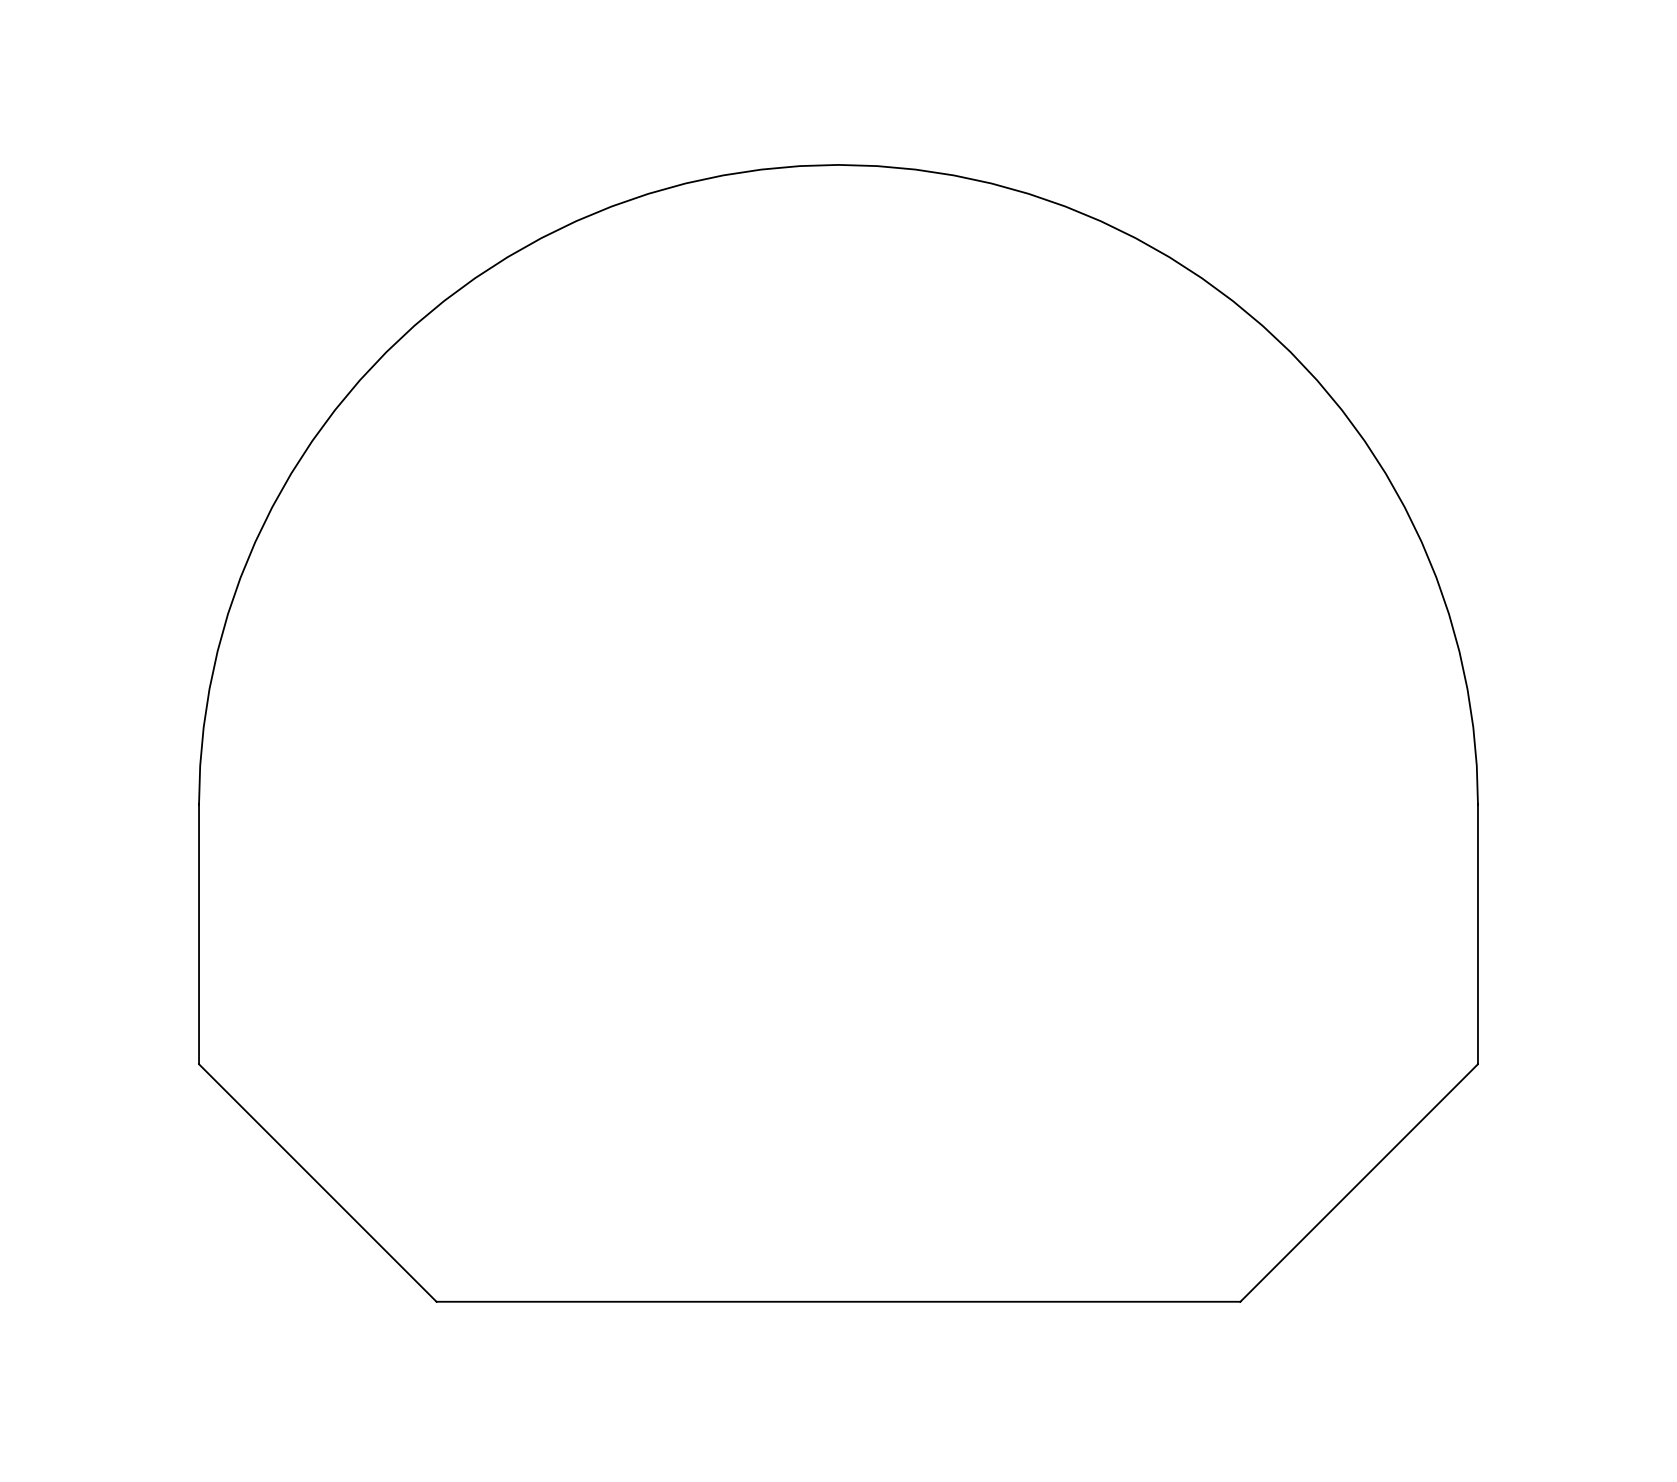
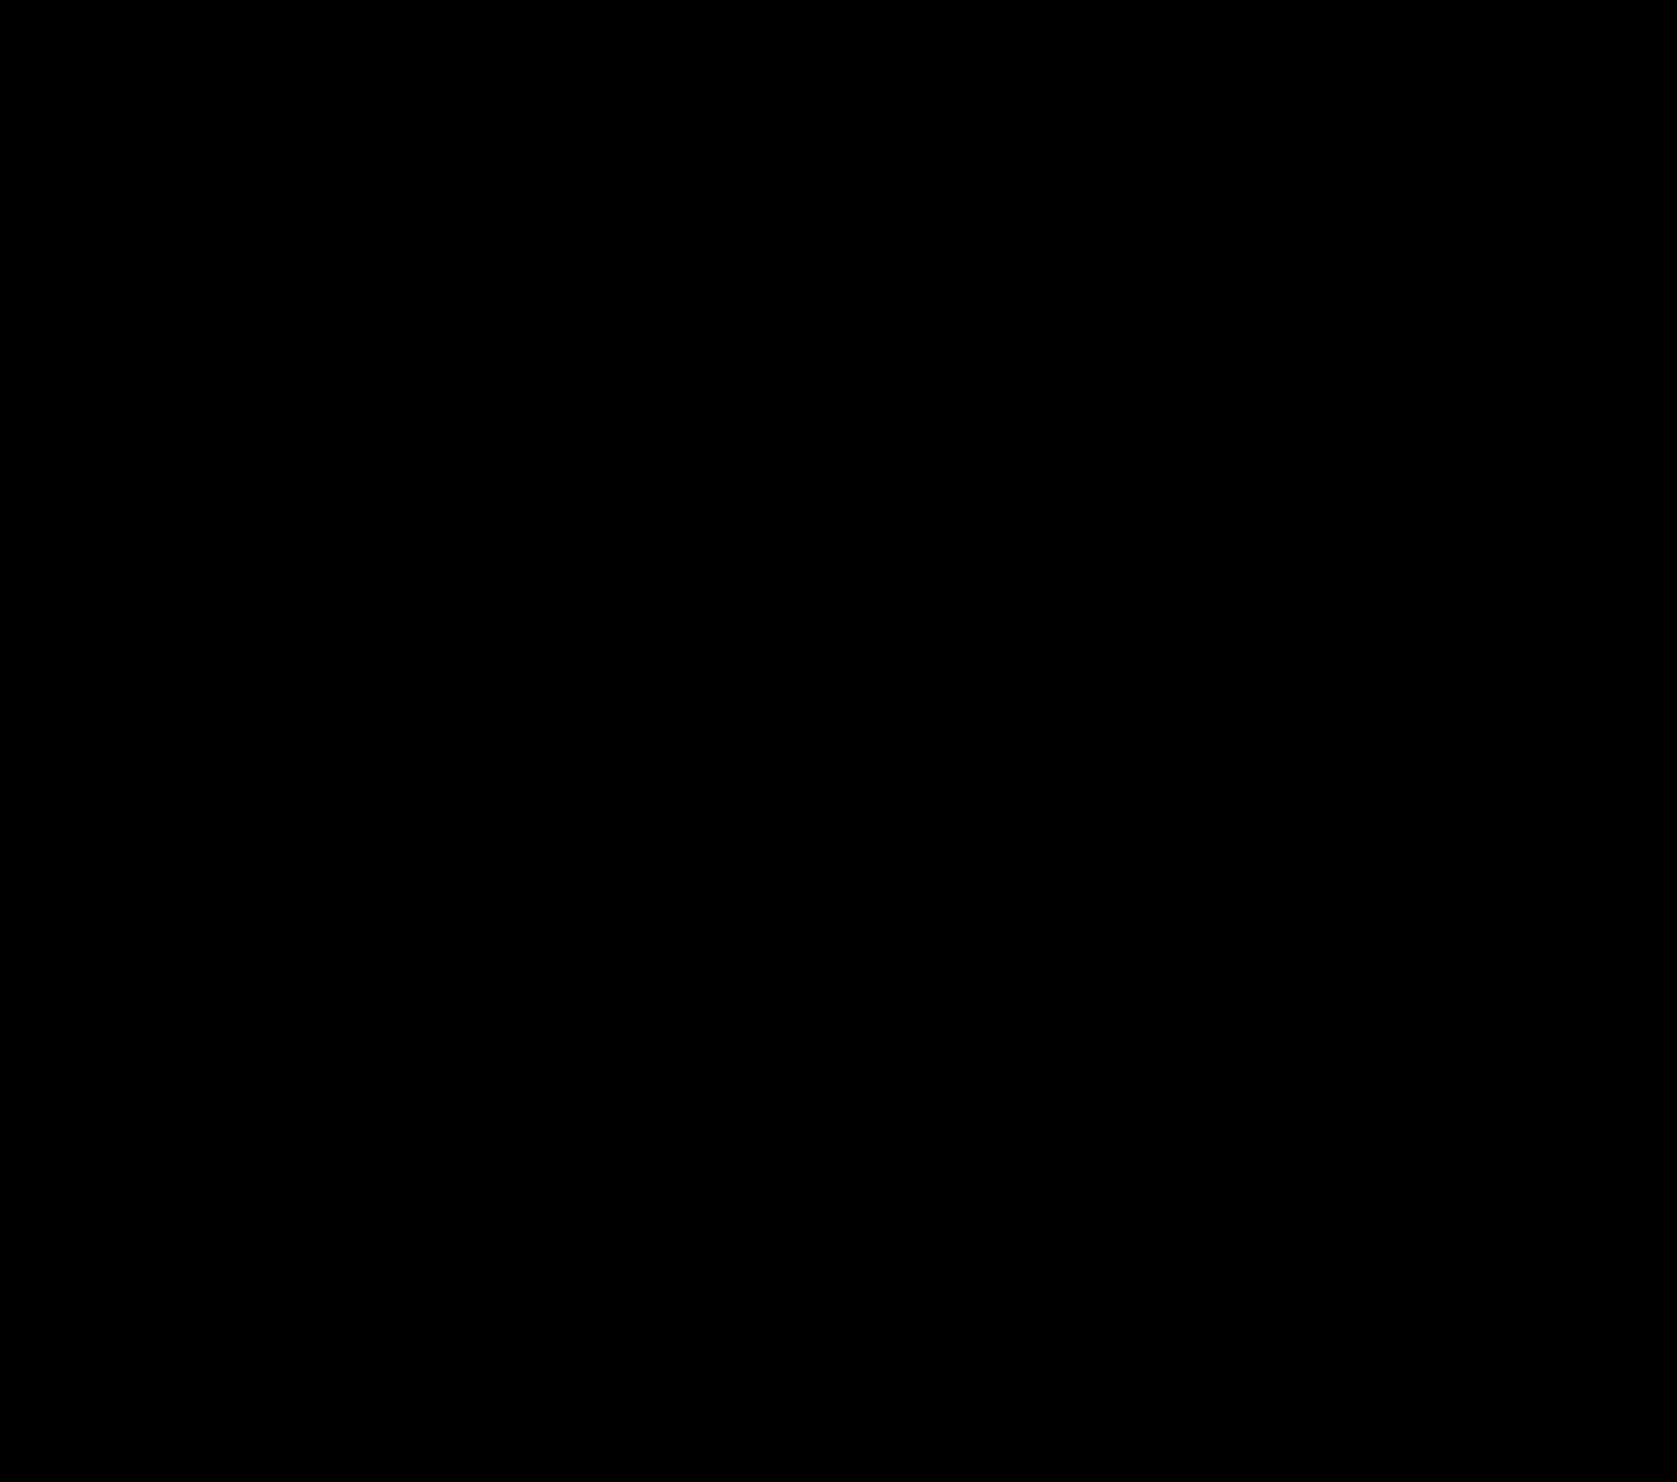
board edge: (1477, 804) (1477, 1064) (1240, 1301) (436, 1301) (199, 1064) (199, 804) (203, 727) (209, 689) (217, 651) (240, 577) (272, 507) (291, 473) (335, 410) (386, 352) (414, 325) (475, 278) (507, 257) (576, 221) (648, 193) (723, 175) (799, 166) (877, 166) (915, 169) (991, 183) (1065, 206) (1135, 238) (1201, 278) (1262, 325) (1317, 380) (1364, 441) (1404, 507) (1421, 541) (1449, 614) (1467, 689) (1473, 727) (1477, 804) -> none

